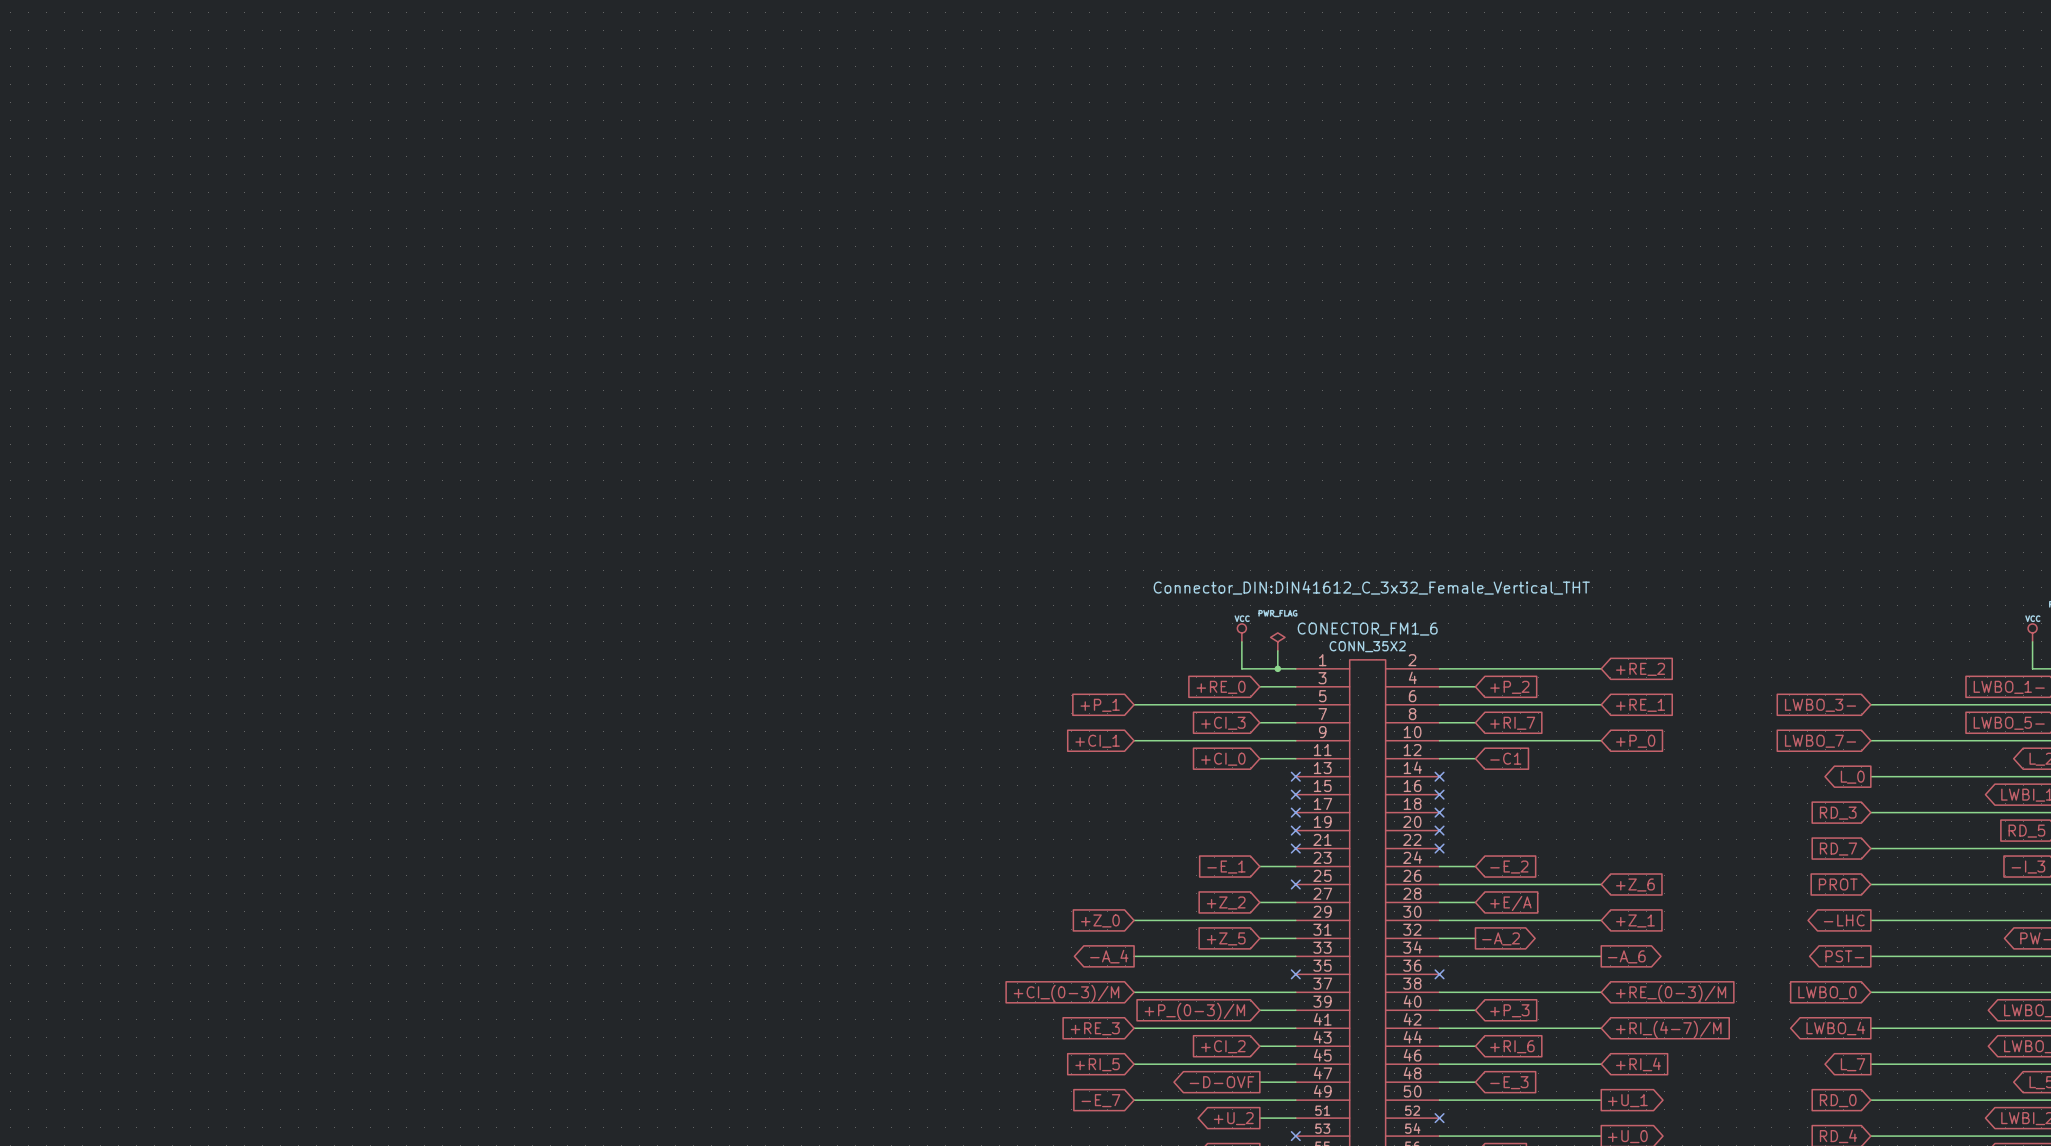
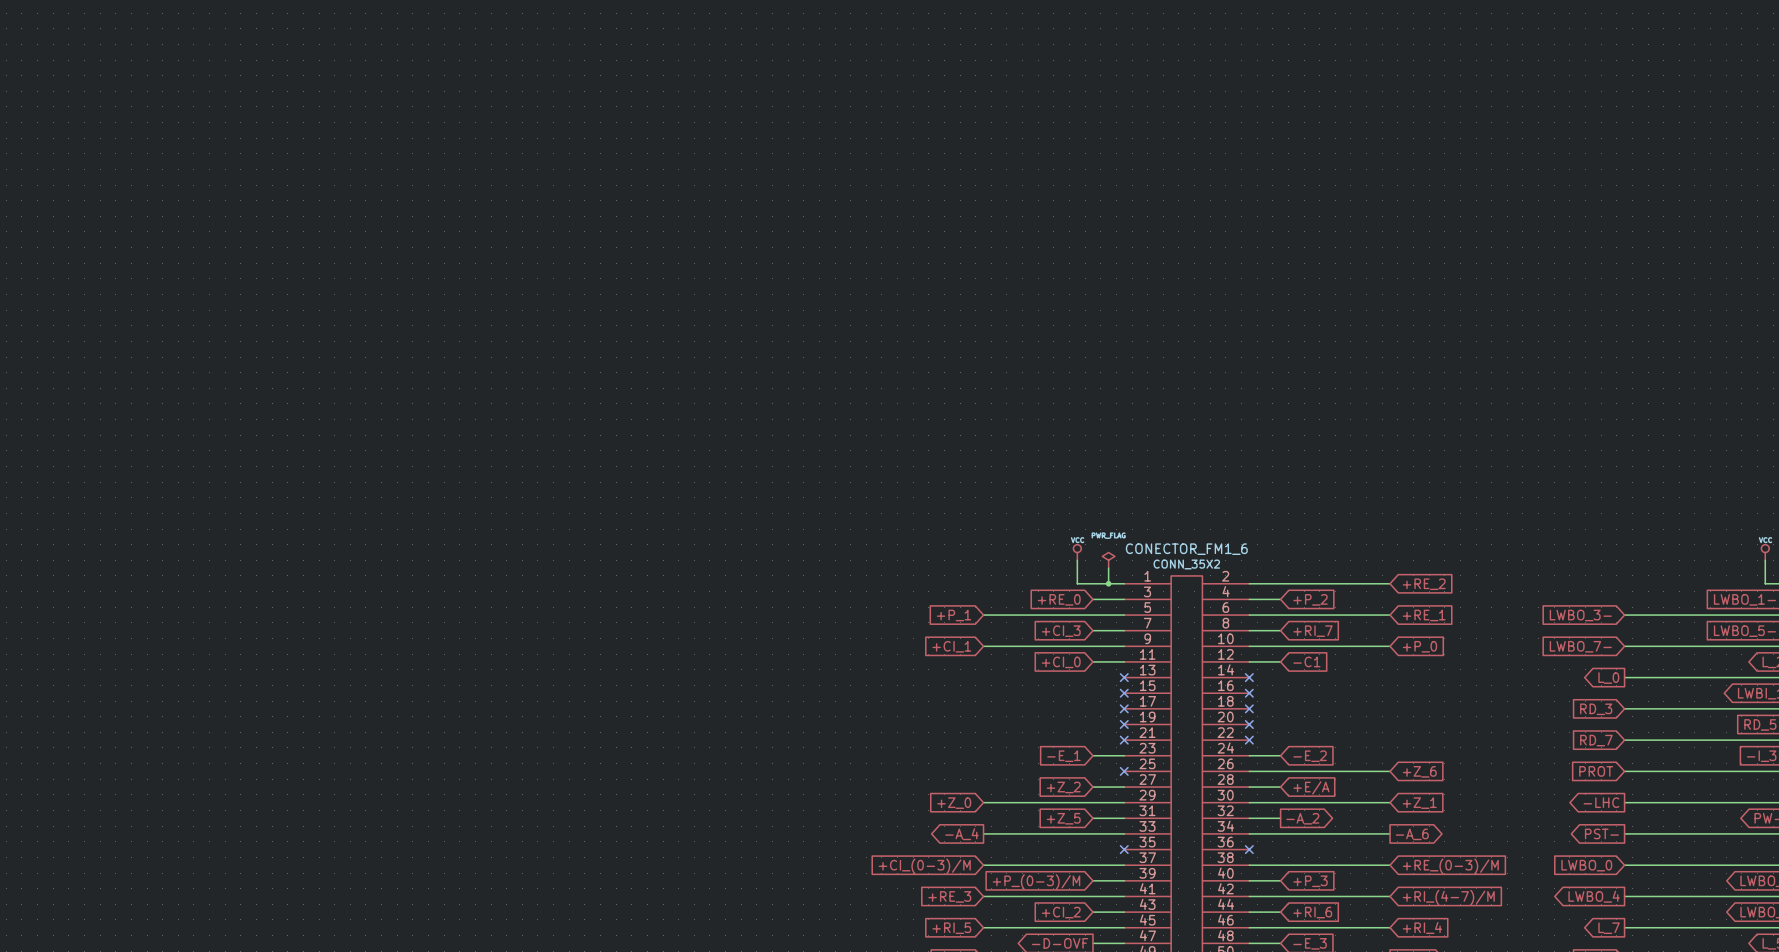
CONECTOR_FM1_6 text: Connector_DIN:DIN41612_C_3x32_Female_Vertical_THT (1371, 587) -> none

